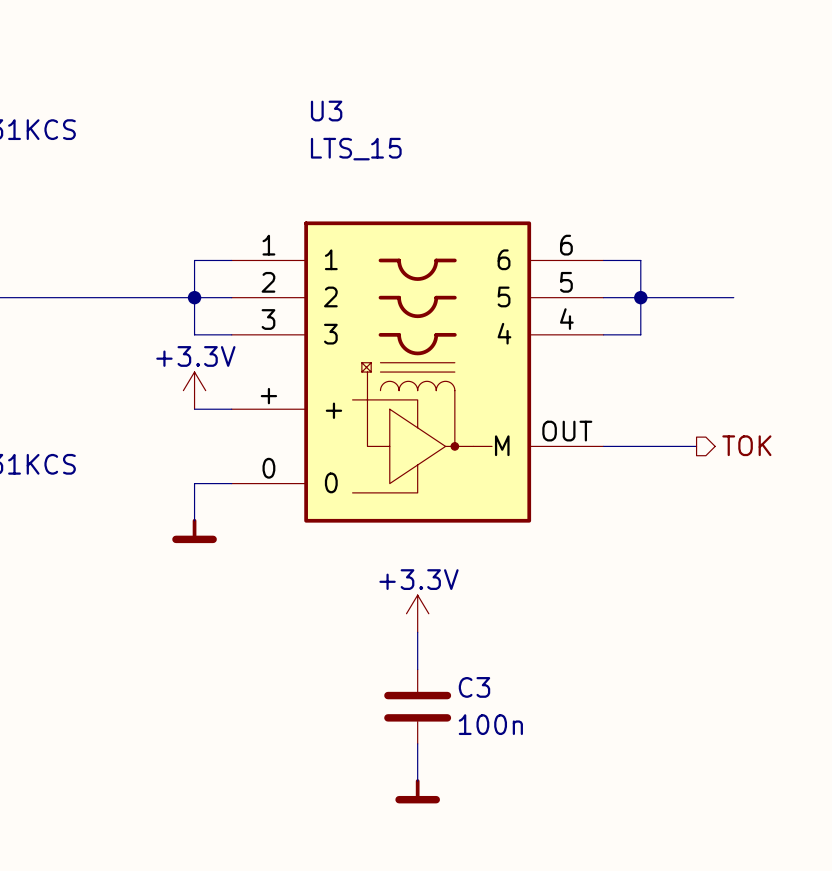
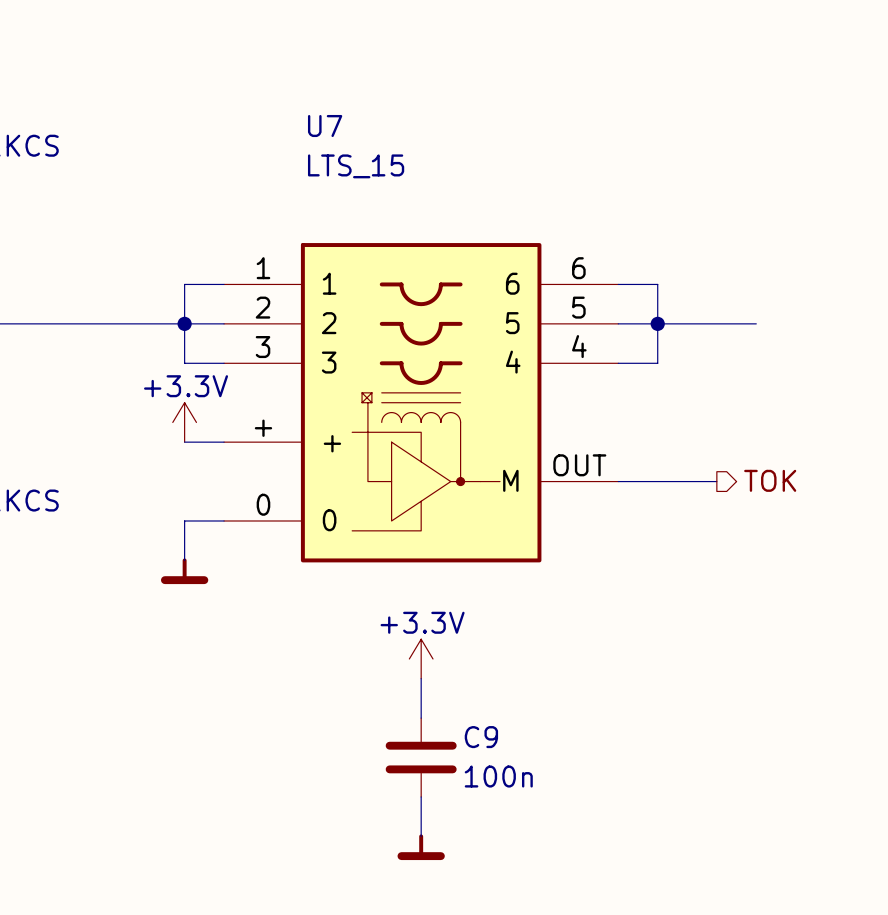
U3 name: U3 (326, 111) -> U7 (325, 126)
C3 name: C3 (474, 687) -> C9 (481, 737)

